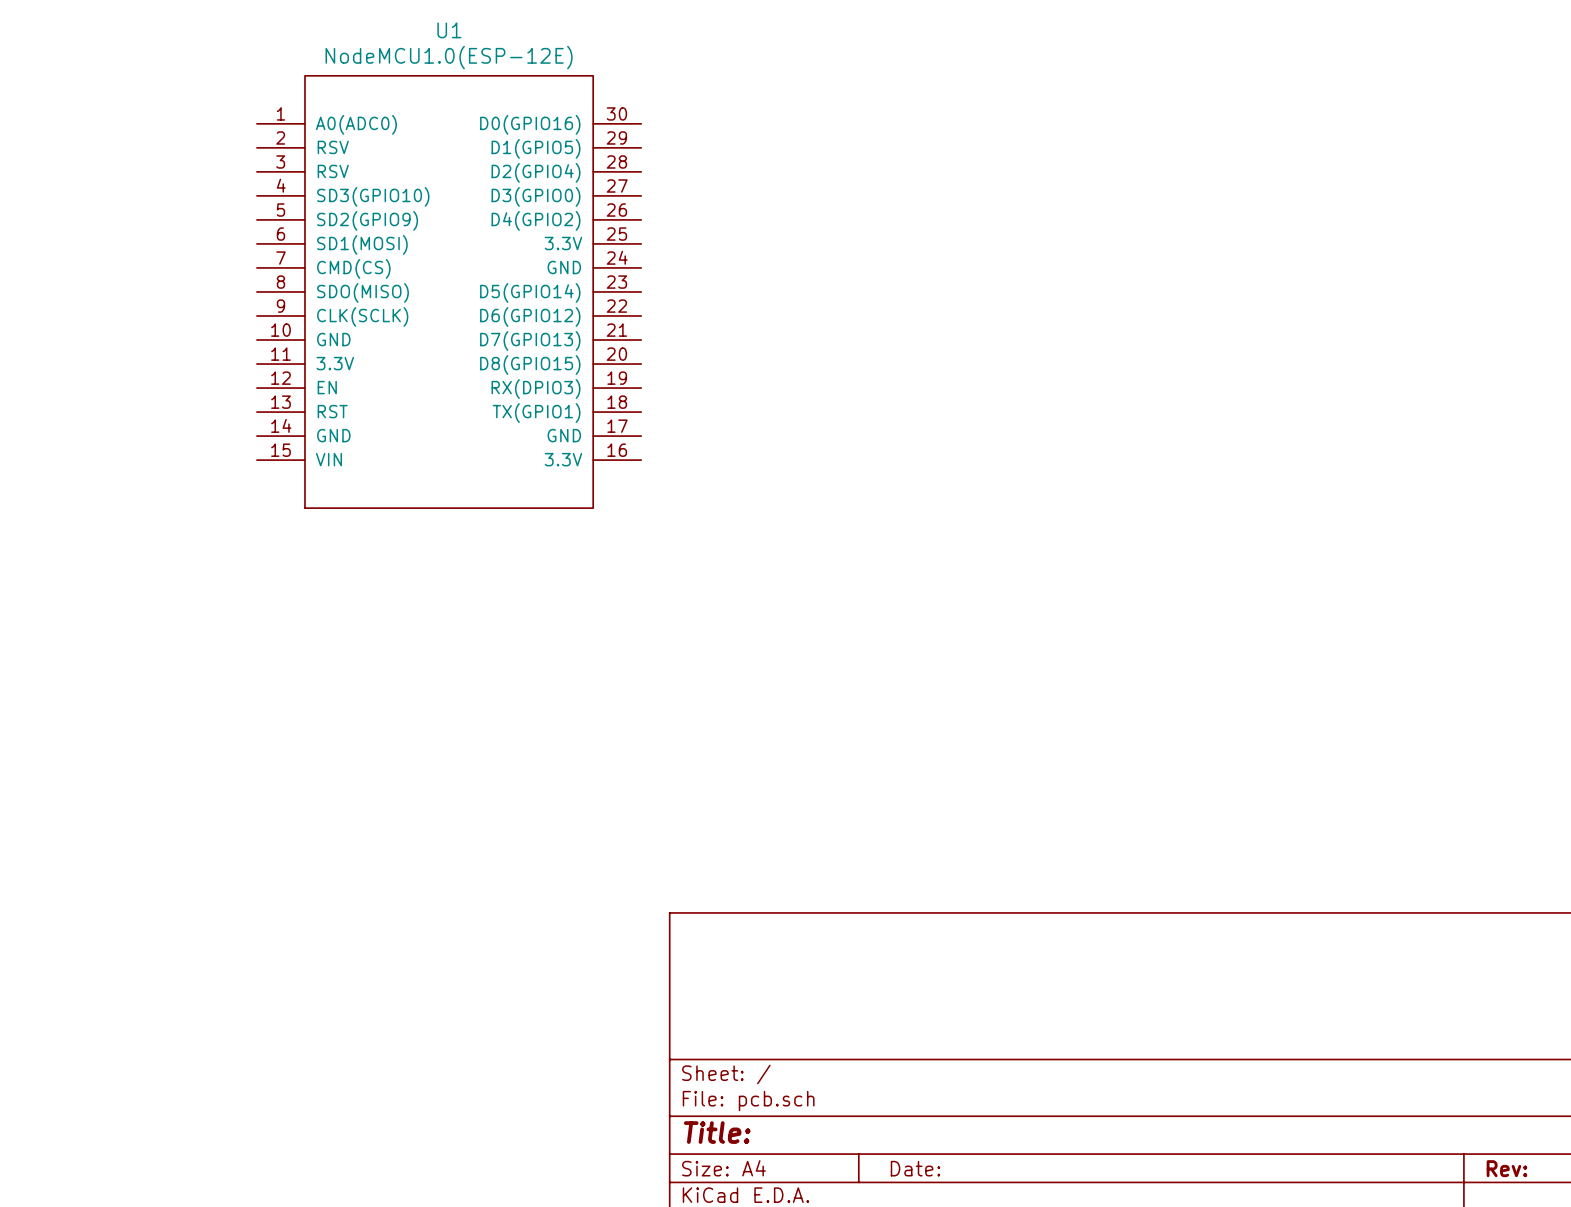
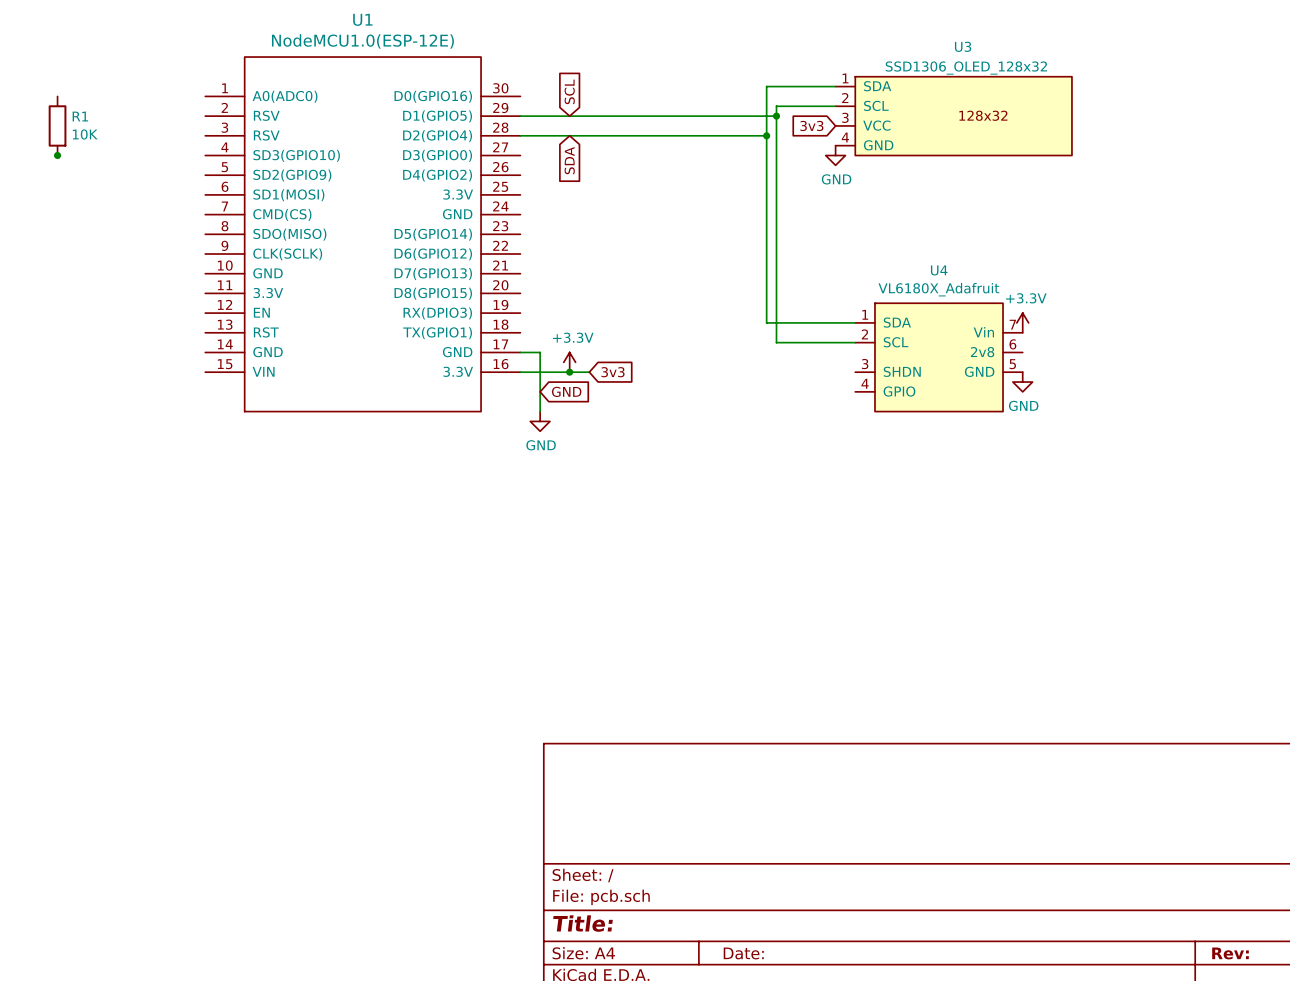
wire: none -> (835, 86) (766, 86) (766, 322) (855, 322)
global label: none -> SCL (569, 91)
wire: none -> (835, 106) (776, 106) (776, 342) (855, 342)
wire: none -> (520, 116) (776, 116)
junction: none -> (776, 116)
U3: none -> SSD1306_OLED_128x32 (953, 116)
R1: none -> 10K (57, 125)
global label: none -> 3v3 (811, 125)
wire: none -> (520, 135) (766, 135)
junction: none -> (766, 135)
junction: none -> (57, 155)
power symbol: none -> GND (835, 155)
global label: none -> SDA (569, 160)
power symbol: none -> +3.3V (1022, 322)
wire: none -> (520, 352) (540, 352) (540, 411)
U4: none -> VL6180X_Adafruit (939, 357)
power symbol: none -> +3.3V (569, 362)
wire: none -> (520, 372) (589, 372)
junction: none -> (569, 372)
global label: none -> 3v3 (613, 372)
power symbol: none -> GND (1022, 382)
global label: none -> GND (566, 391)
power symbol: none -> GND (540, 421)

